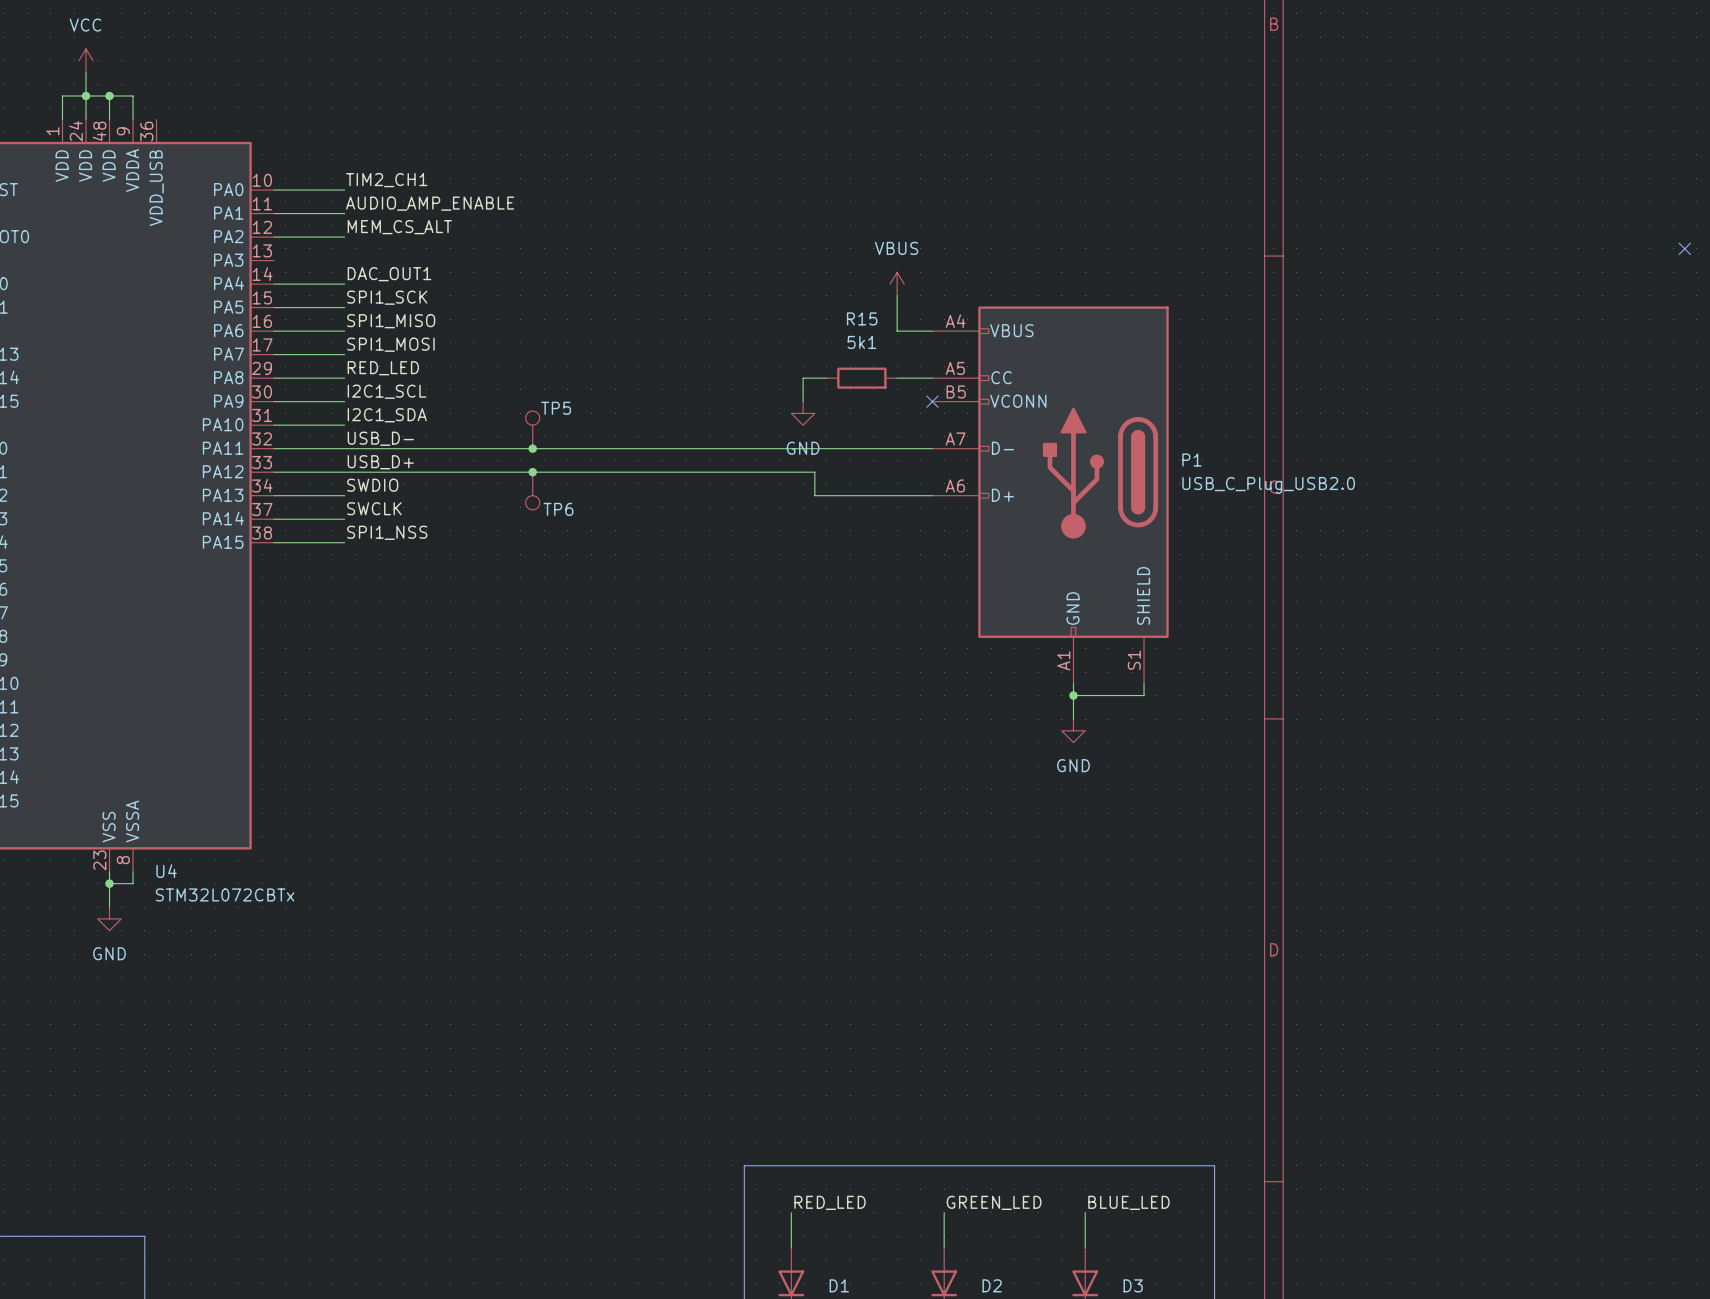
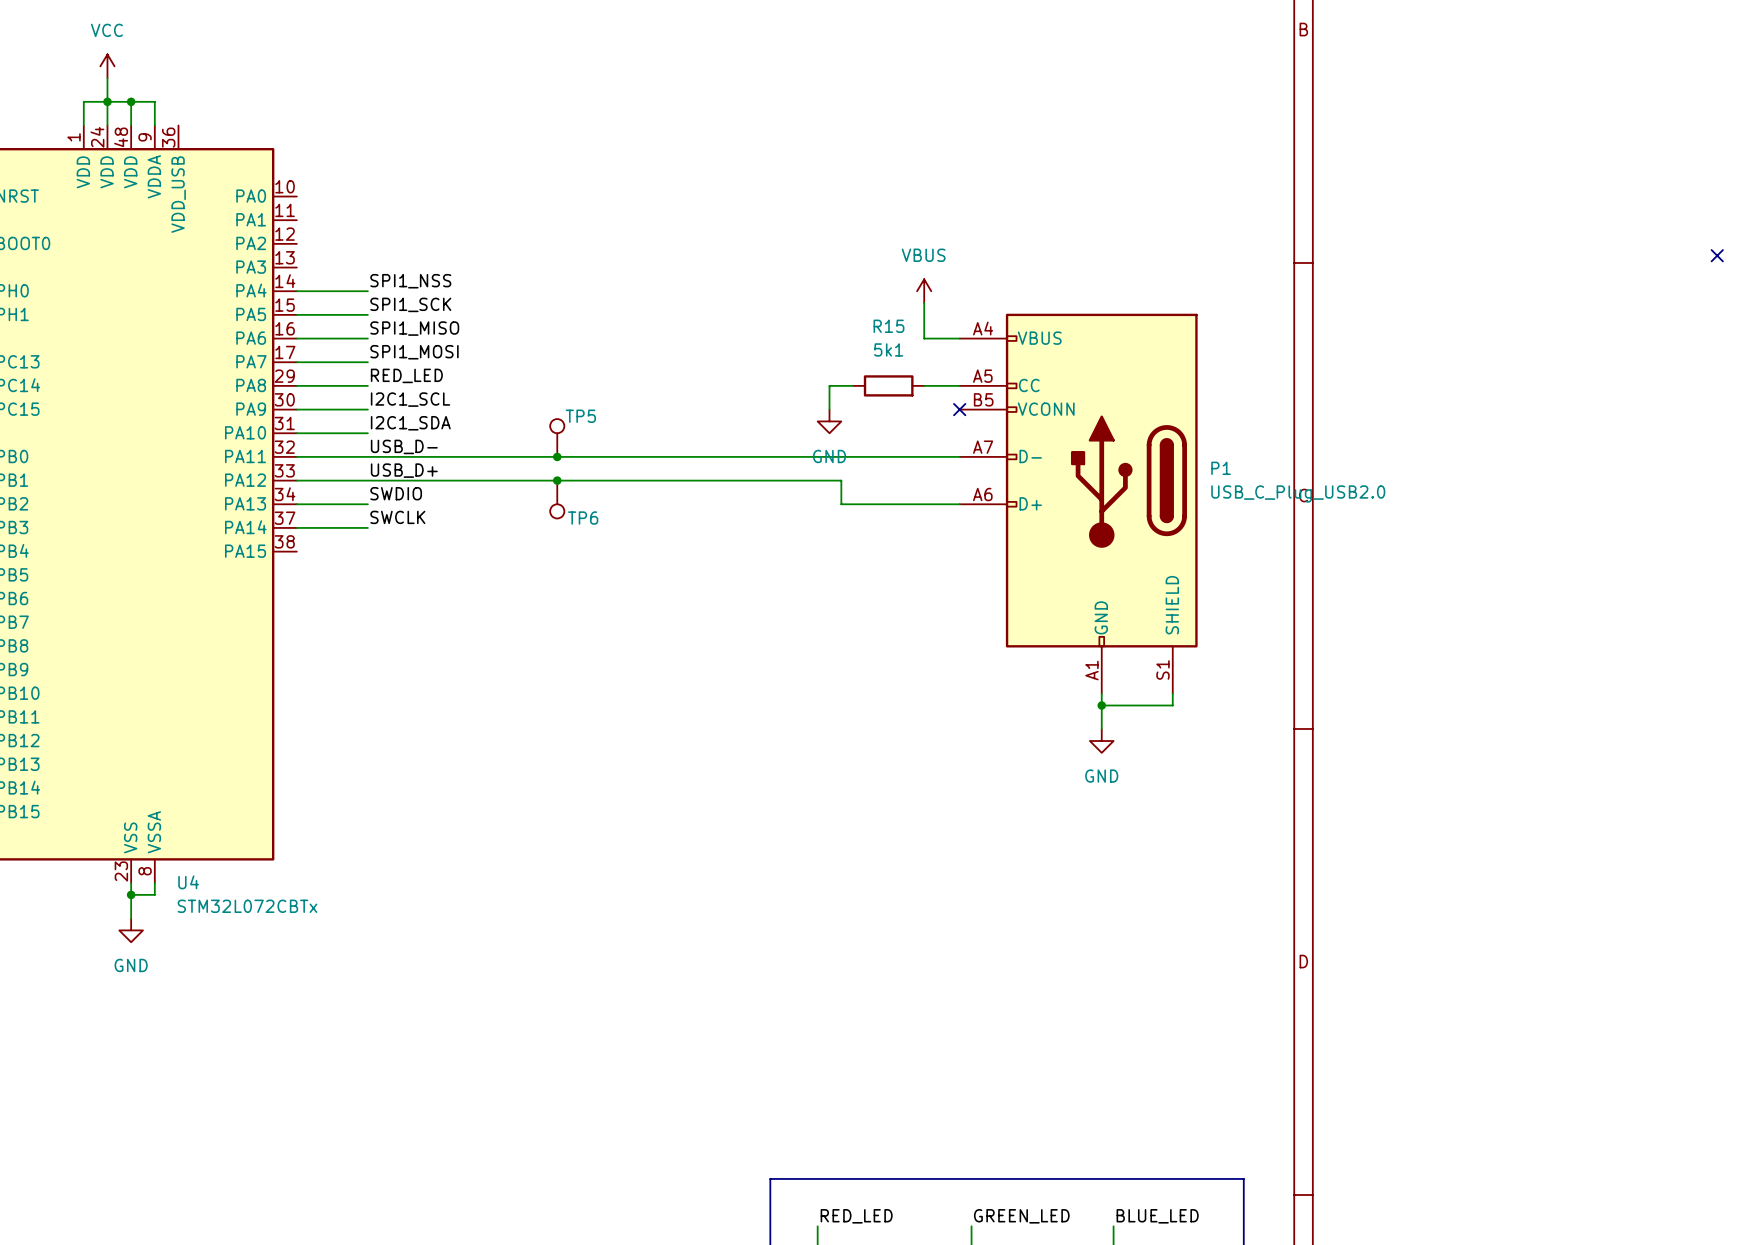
label: TIM2_CH1 (386, 180) -> none
wire: (274, 190) (344, 190) -> none
label: AUDIO_AMP_ENABLE (430, 203) -> none
wire: (274, 213) (344, 213) -> none
label: MEM_CS_ALT (399, 227) -> none
wire: (274, 237) (344, 237) -> none
label: DAC_OUT1 (389, 274) -> SPI1_NSS (410, 281)
label: SPI1_NSS (387, 532) -> none
wire: (274, 542) (344, 542) -> none

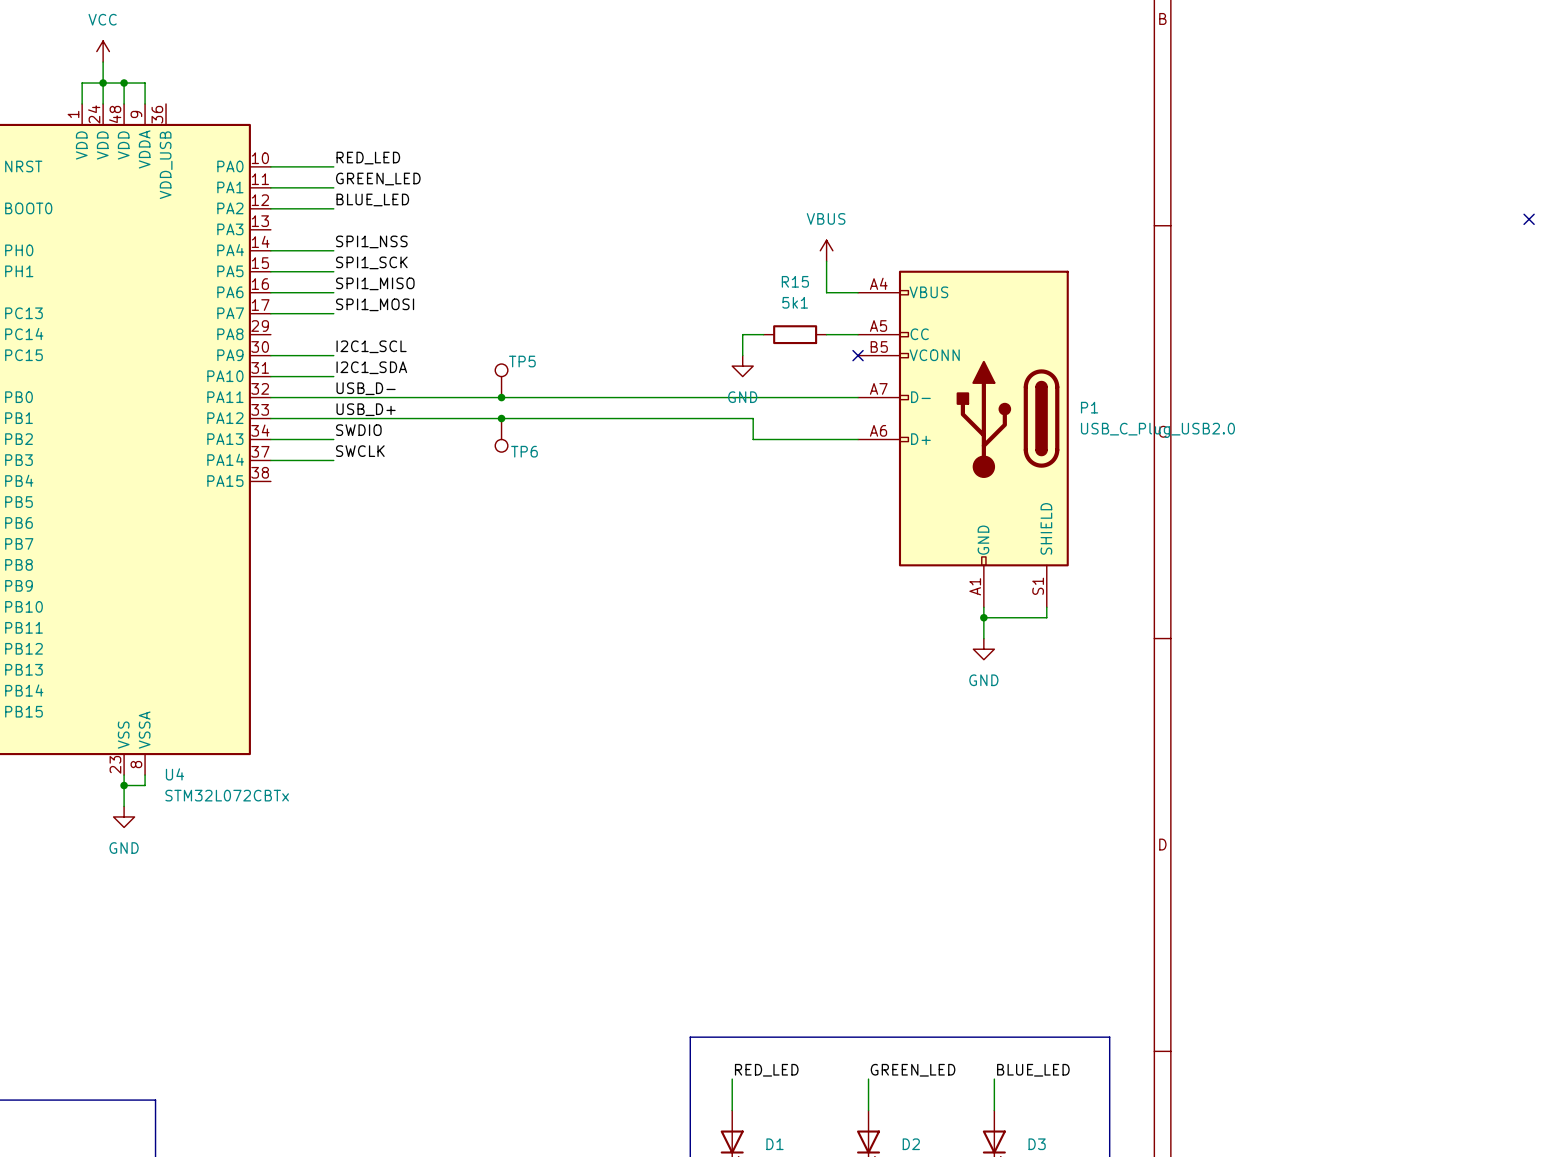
wire: none -> (270, 166) (333, 166)
label: none -> GREEN_LED (378, 179)
wire: none -> (270, 187) (333, 187)
label: none -> BLUE_LED (372, 199)
label position: RED_LED (406, 375) -> RED_LED (368, 158)
wire: (296, 385) (367, 385) -> (270, 208) (333, 208)

